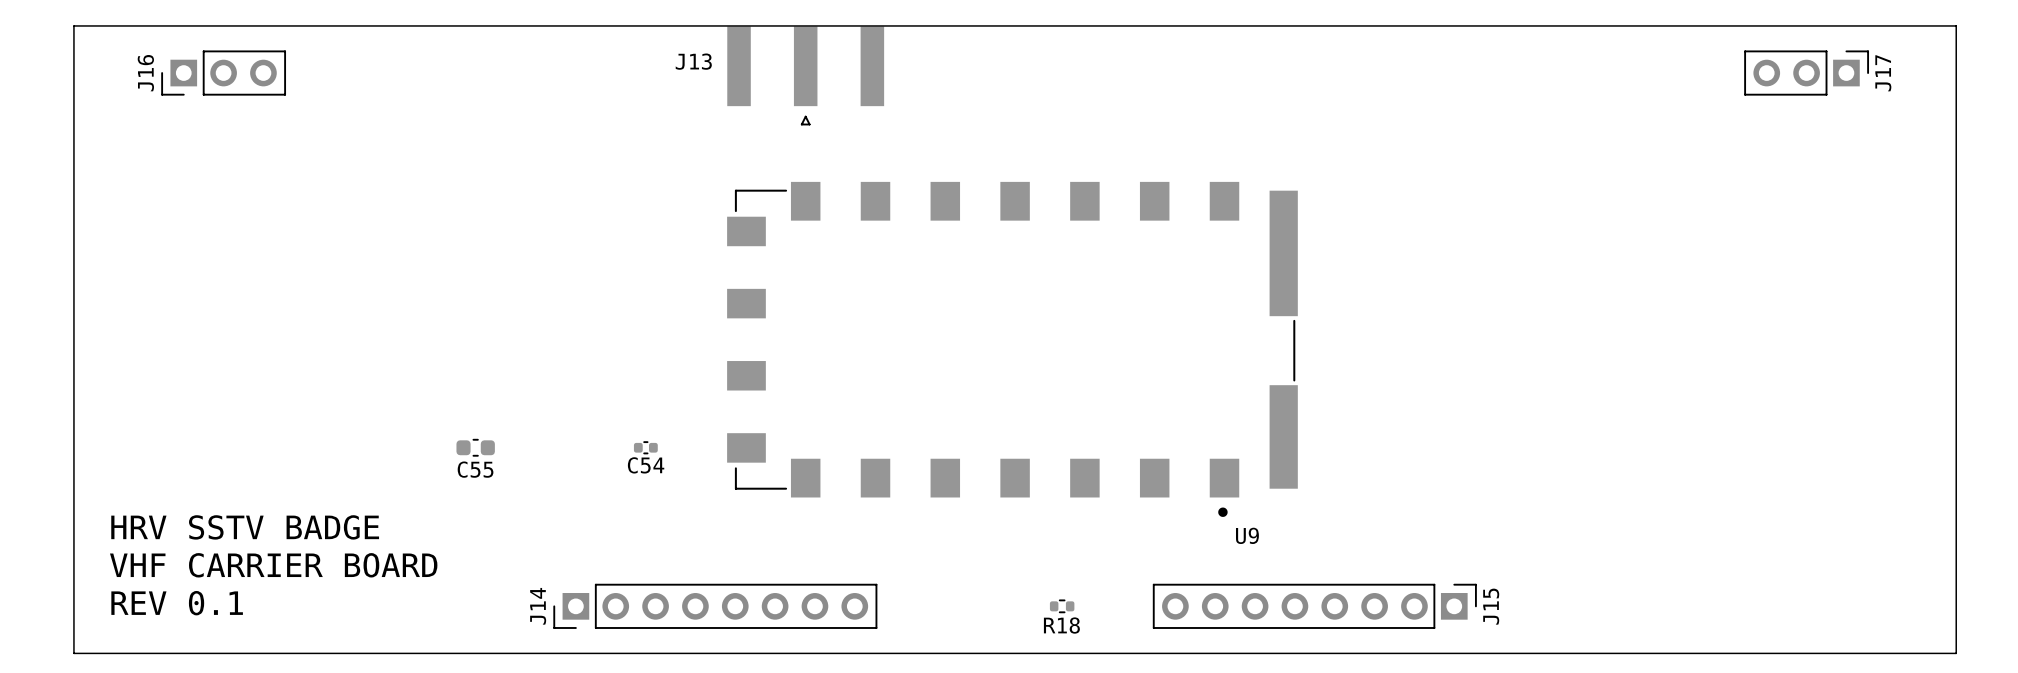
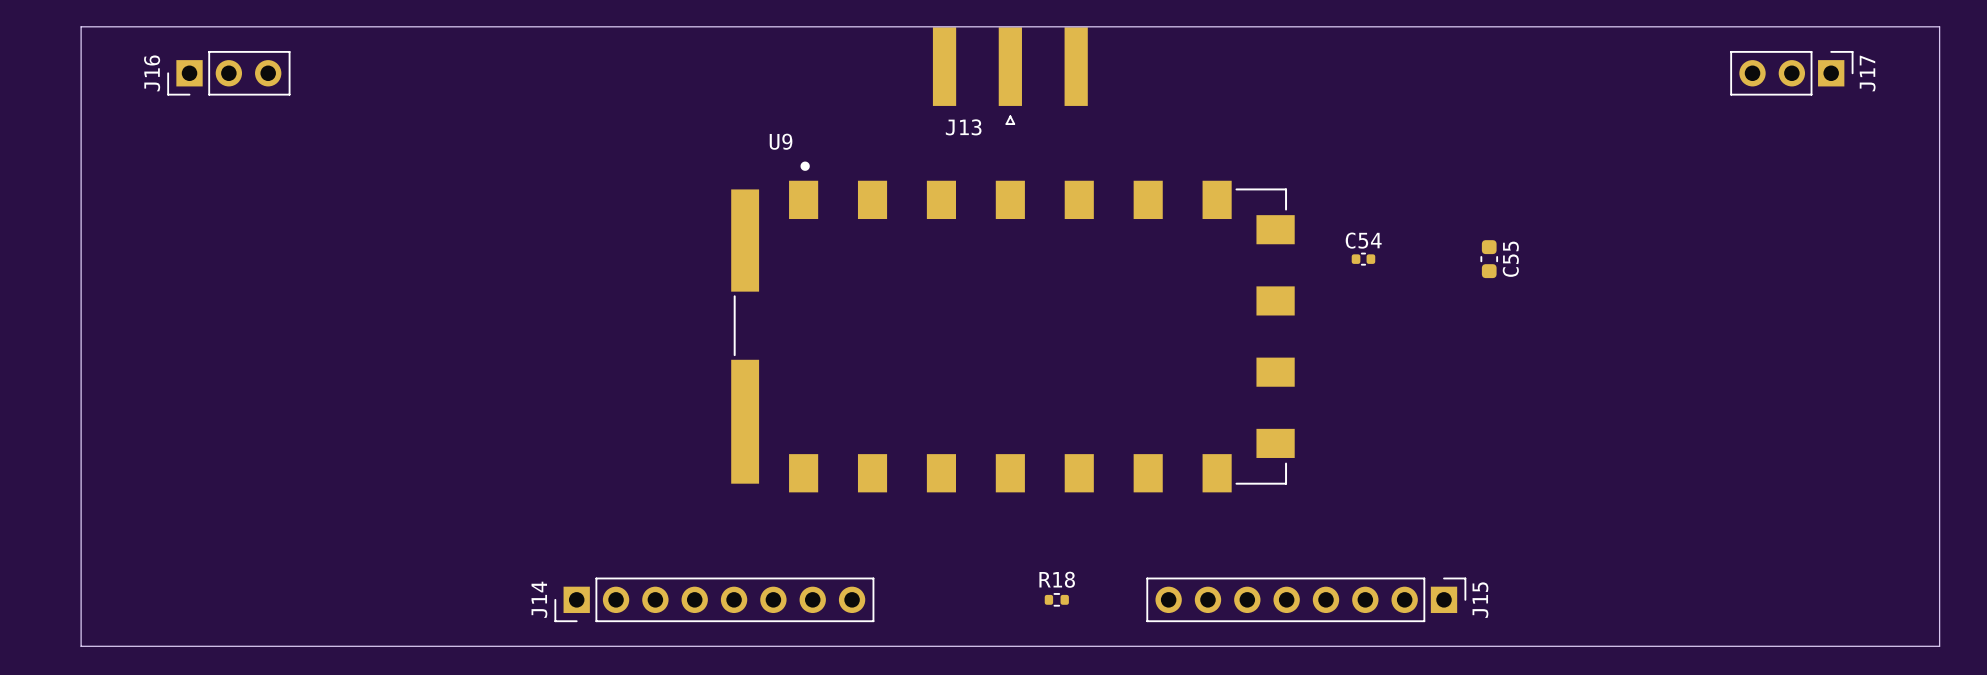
J13 name position: J13 (693, 61) -> J13 (963, 127)
J13 position: (805, 75) -> (1010, 76)
U9 rotation: 0° (1012, 349) -> 180° (1012, 326)
C55 rotation: 0° (475, 447) -> 90° clockwise (1489, 259)
C55 position: (475, 447) -> (1489, 259)
C54 position: (645, 447) -> (1363, 259)
C54 name position: C54 (646, 465) -> C54 (1363, 240)
C55 name position: C55 (475, 469) -> C55 (1510, 259)
text: HRV SSTV BADGE (245, 527) -> none
text: VHF CARRIER BOARD (273, 565) -> none
text: REV 0.1 (177, 603) -> none
R18 name position: R18 (1061, 625) -> R18 (1057, 579)

